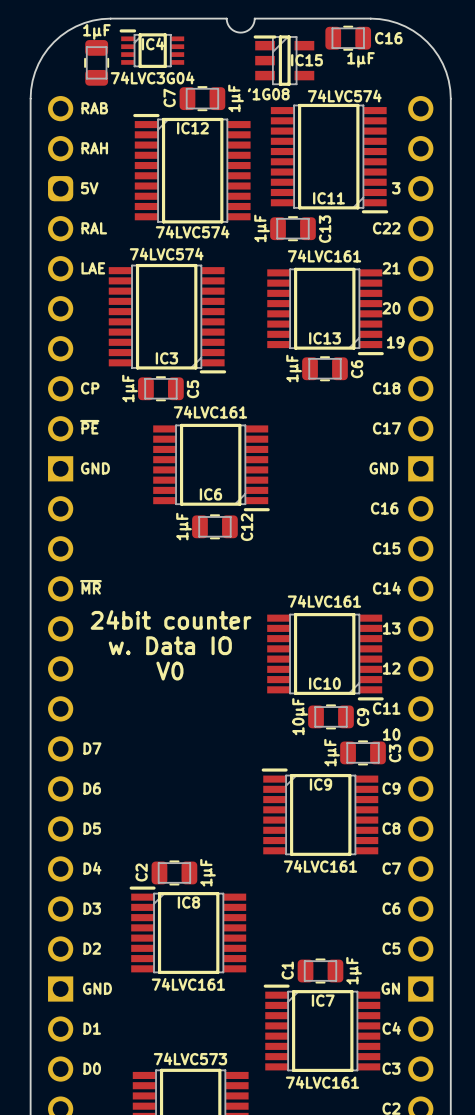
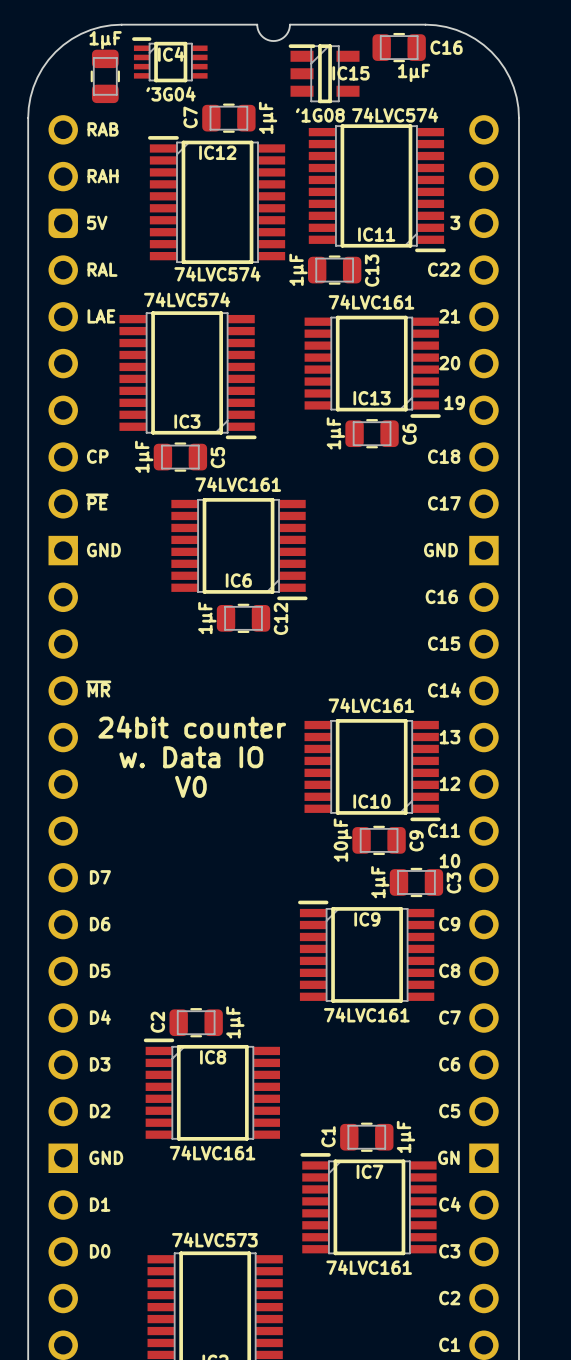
IC4 text: 74LVC3G04 (152, 78) -> '3G04 (171, 94)
IC15 text: '1G08 (268, 94) -> none
IC15 text: none -> '1G08 (320, 115)

